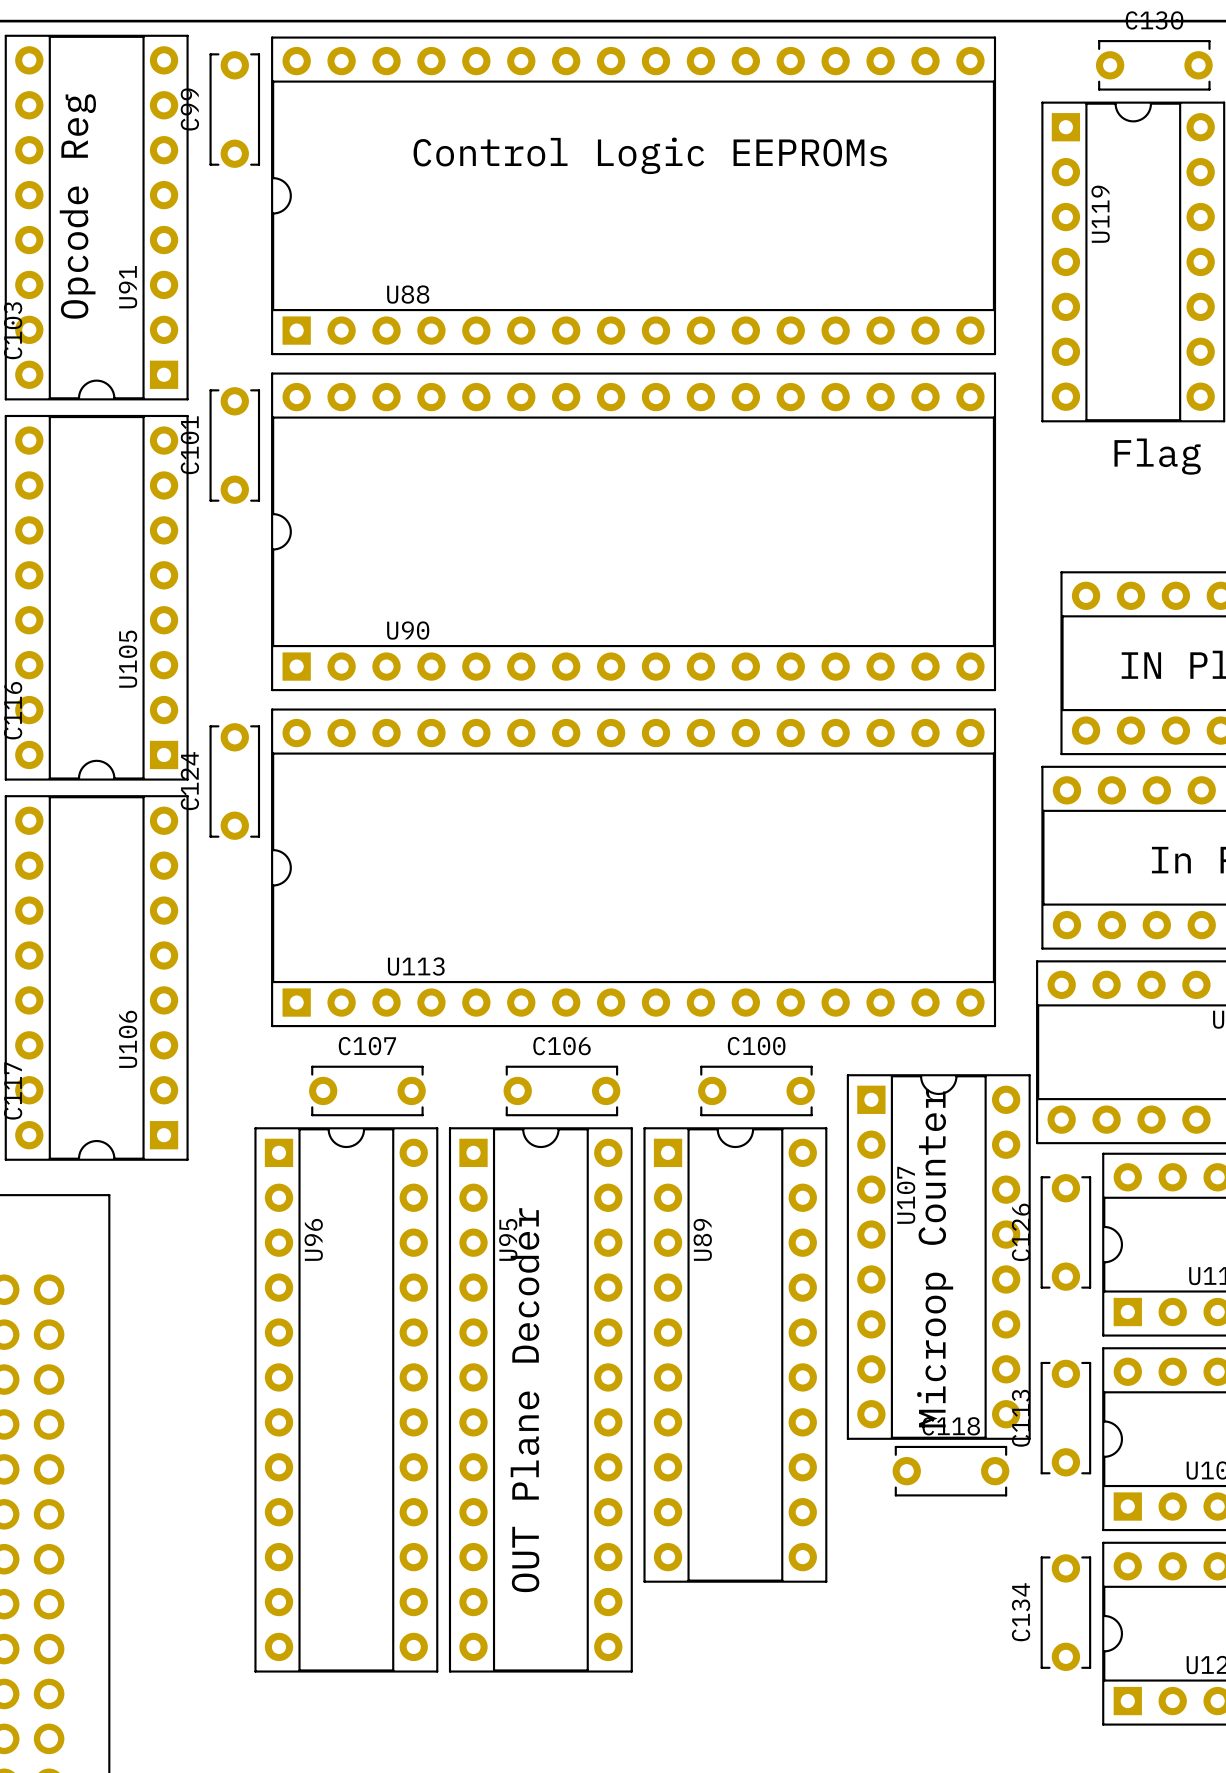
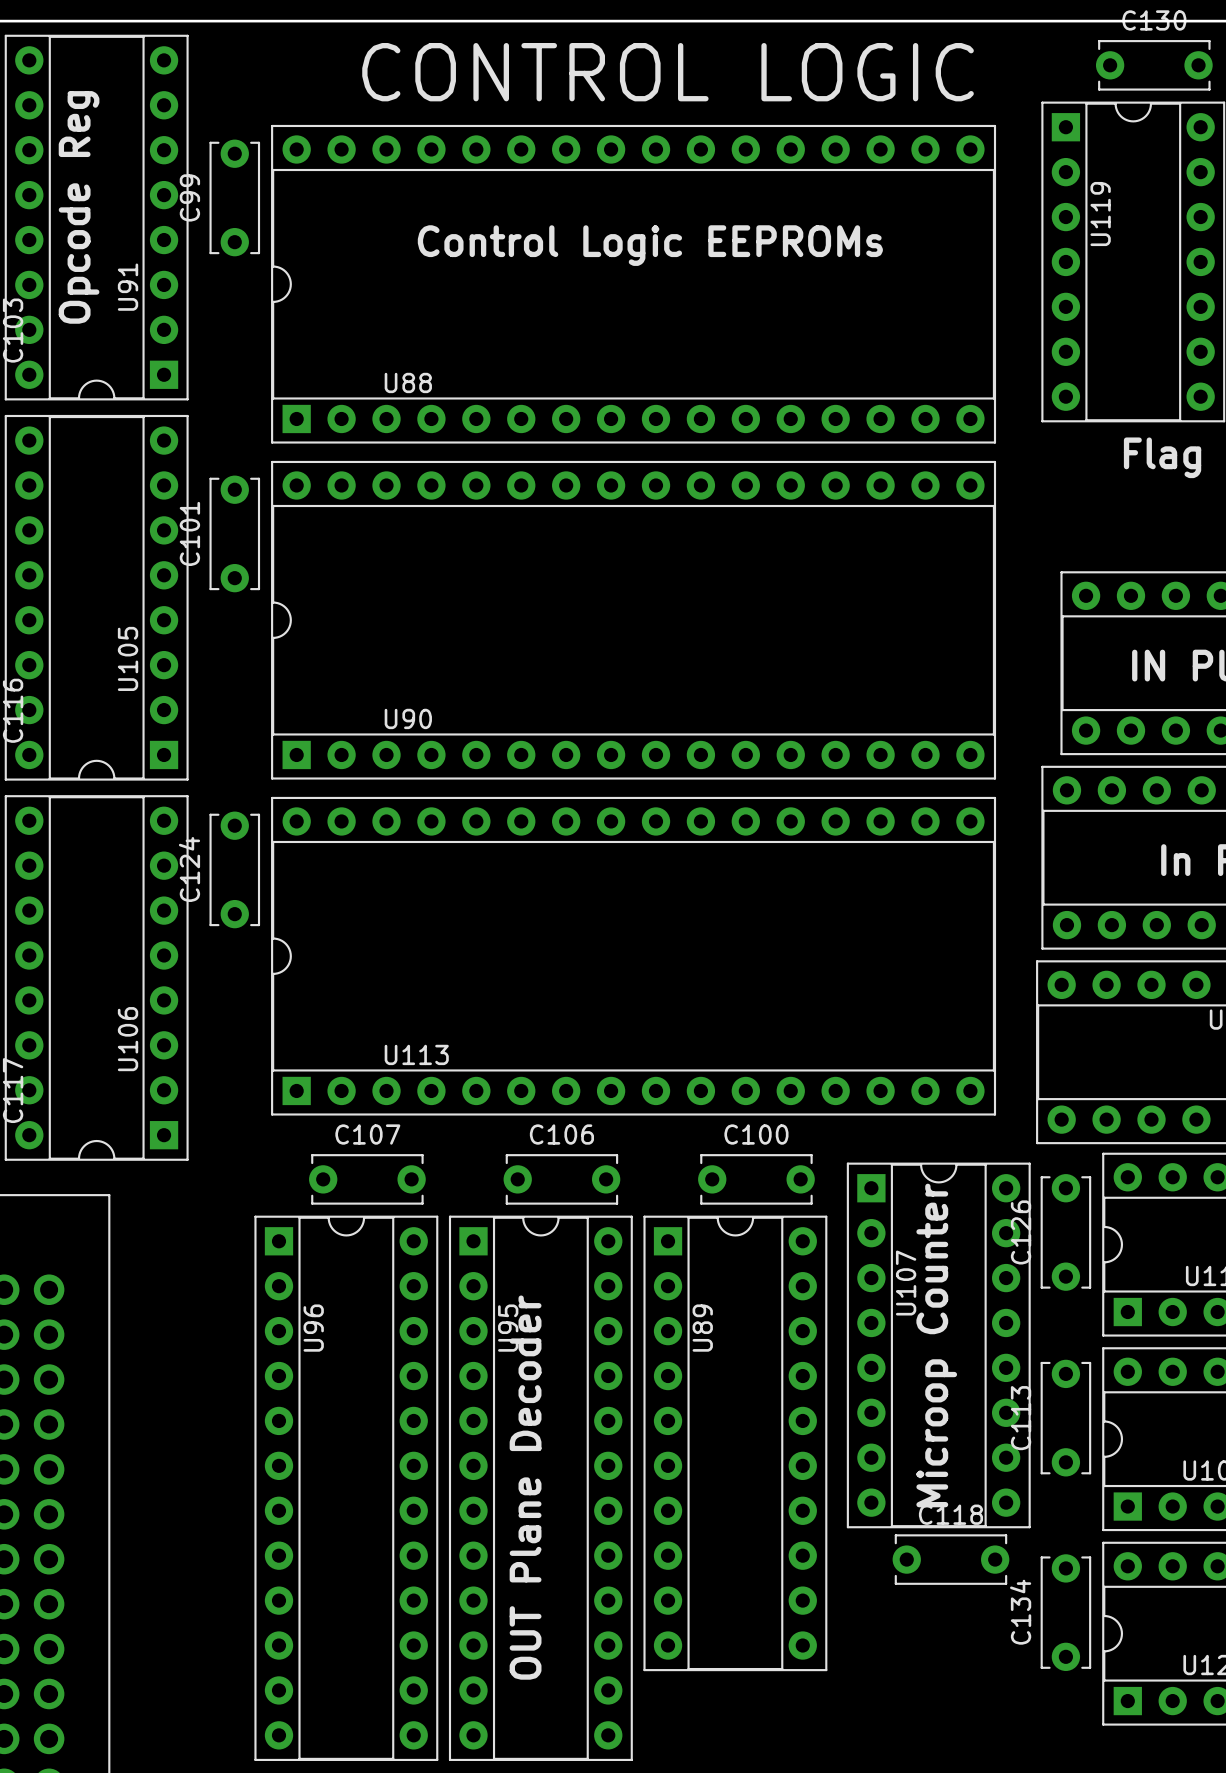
text: none -> CONTROL LOGIC (668, 72)
C99 position: (234, 109) -> (234, 197)
text position: Control Logic EEPROMs (650, 155) -> Control Logic EEPROMs (650, 245)
U88 position: (633, 195) -> (633, 284)
C101 position: (234, 445) -> (234, 533)
U90 position: (633, 531) -> (633, 620)
C124 position: (234, 781) -> (234, 869)
U113 position: (633, 867) -> (633, 956)
C107 position: (367, 1090) -> (367, 1179)
C106 position: (561, 1090) -> (561, 1179)
C100 position: (756, 1090) -> (756, 1179)
U107 position: (938, 1257) -> (938, 1345)
text position: Microop Counter (935, 1258) -> Microop Counter (936, 1345)
U89 position: (735, 1354) -> (735, 1443)
U96 position: (346, 1399) -> (346, 1488)
U95 position: (540, 1399) -> (540, 1488)
text position: OUT Plane Decoder (525, 1400) -> OUT Plane Decoder (525, 1487)
C118 position: (950, 1471) -> (950, 1559)

